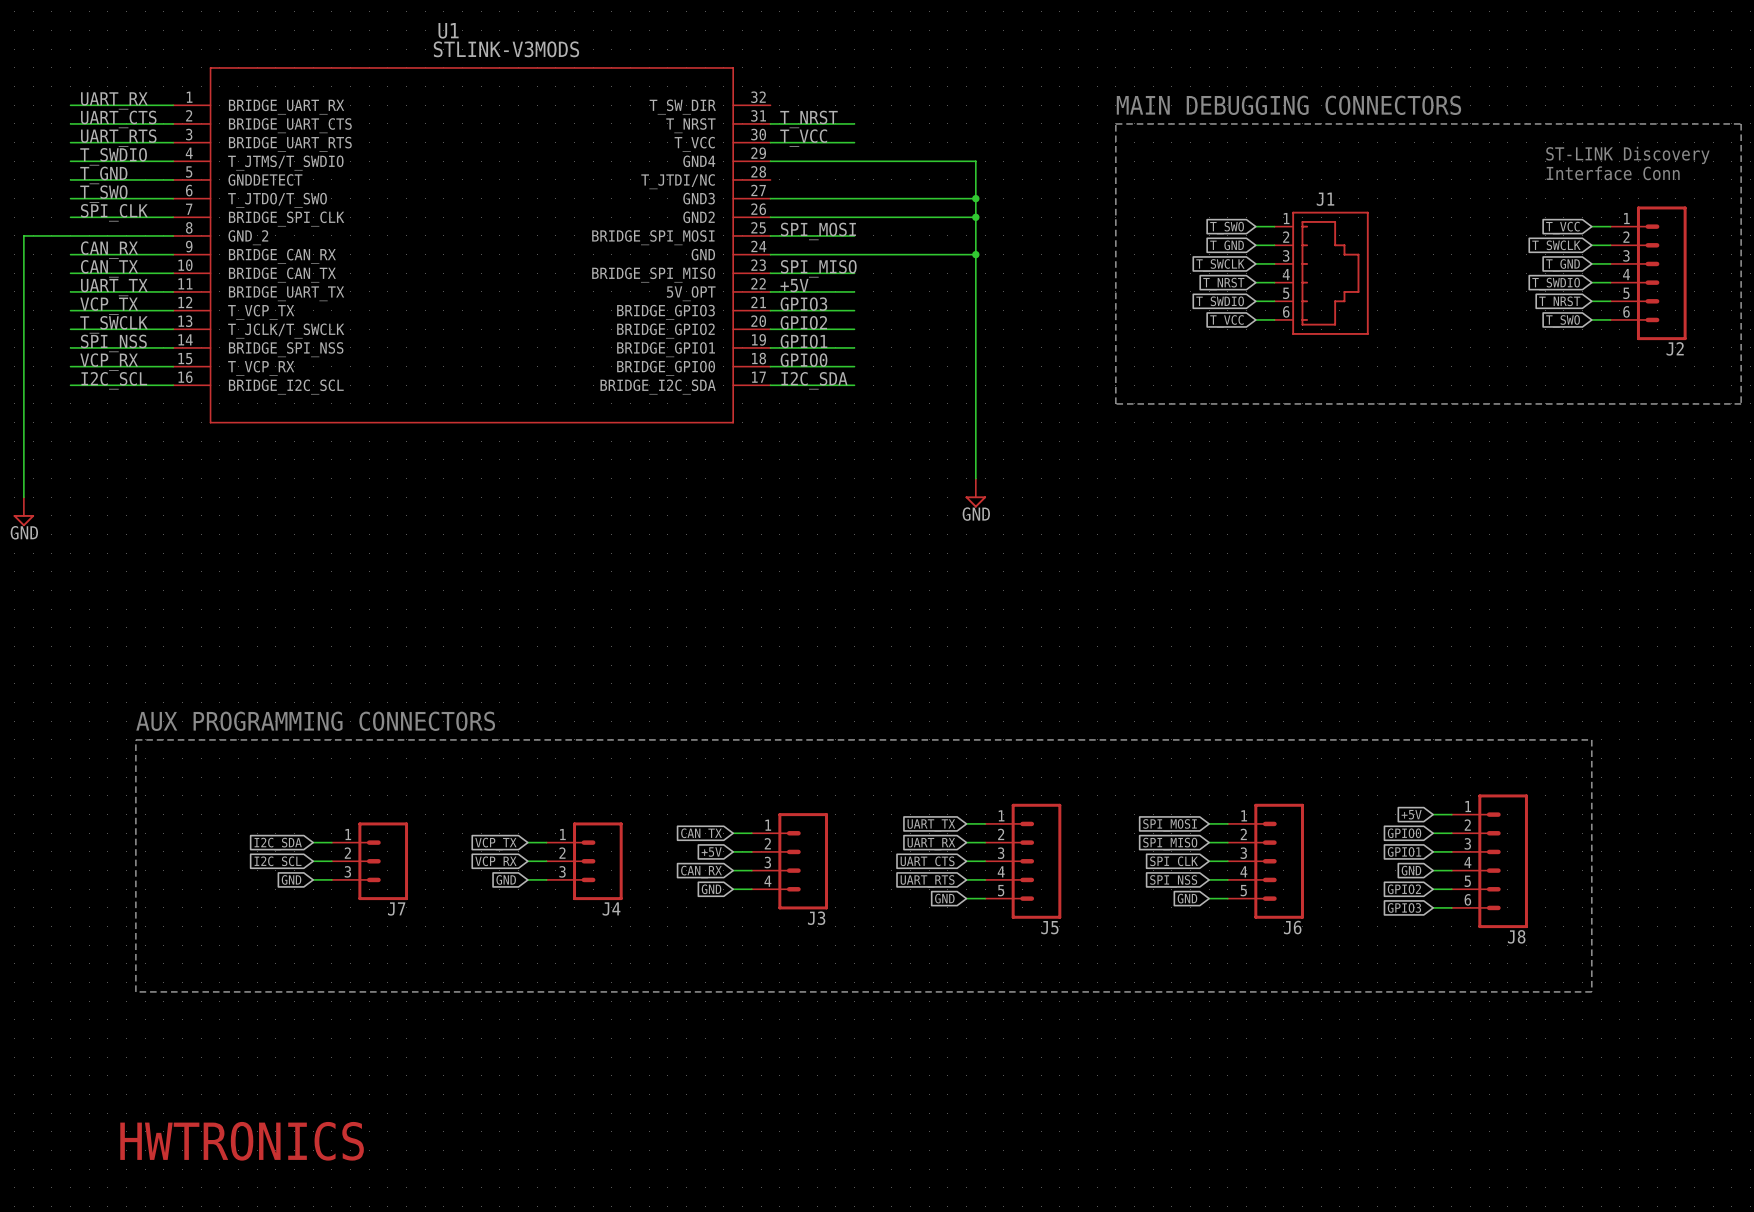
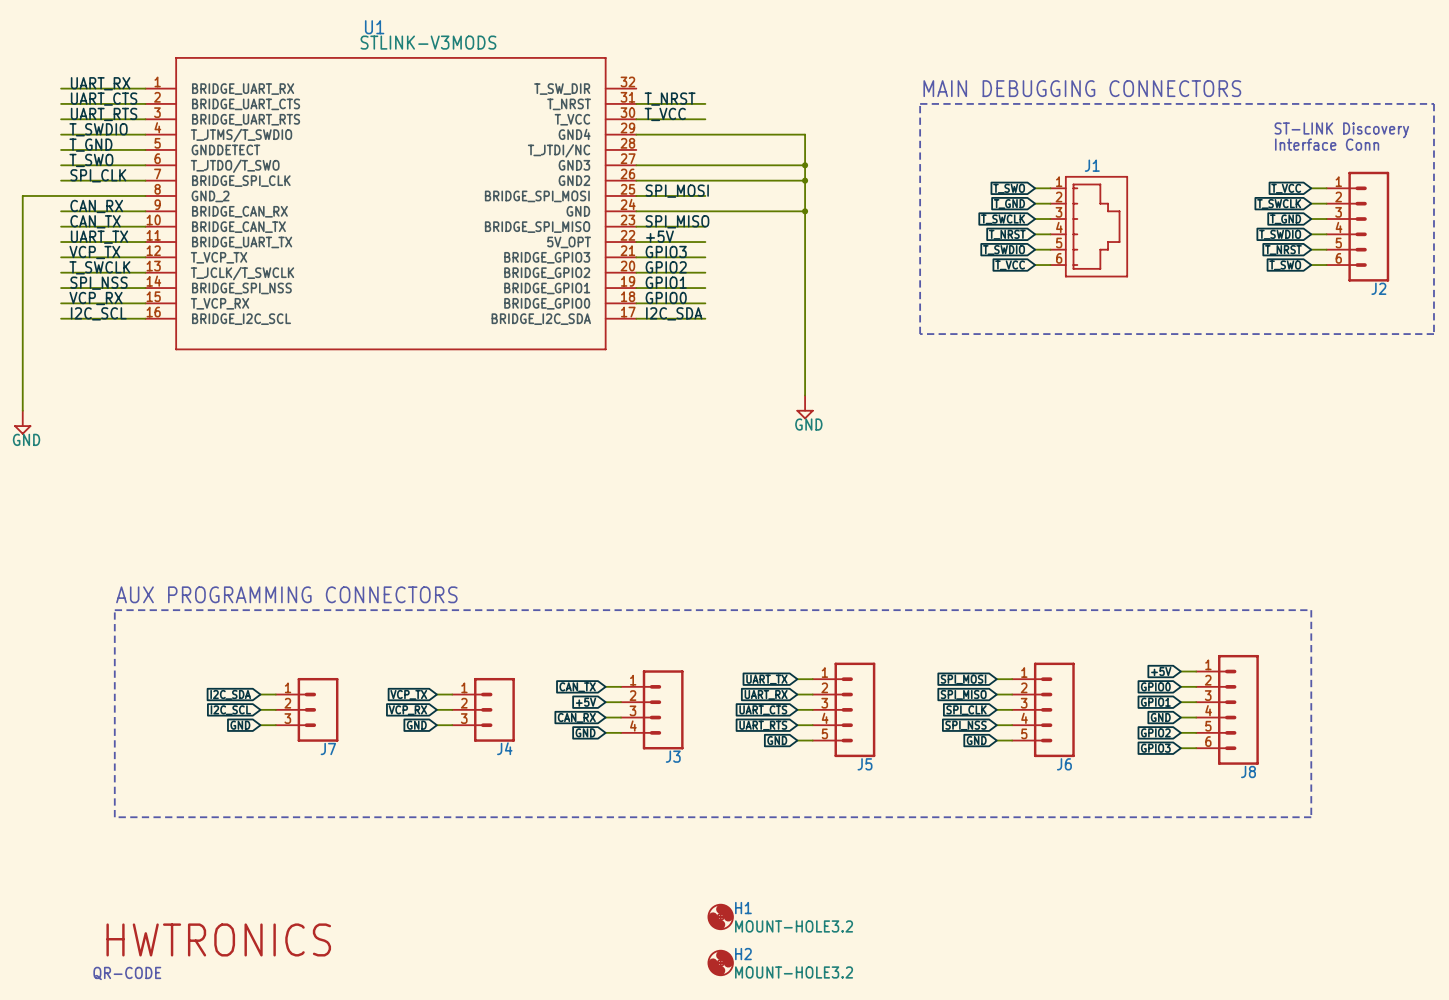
H1: none -> MOUNT-HOLE3.2 (720, 916)
H2: none -> MOUNT-HOLE3.2 (720, 962)
part: none -> (127, 973)

